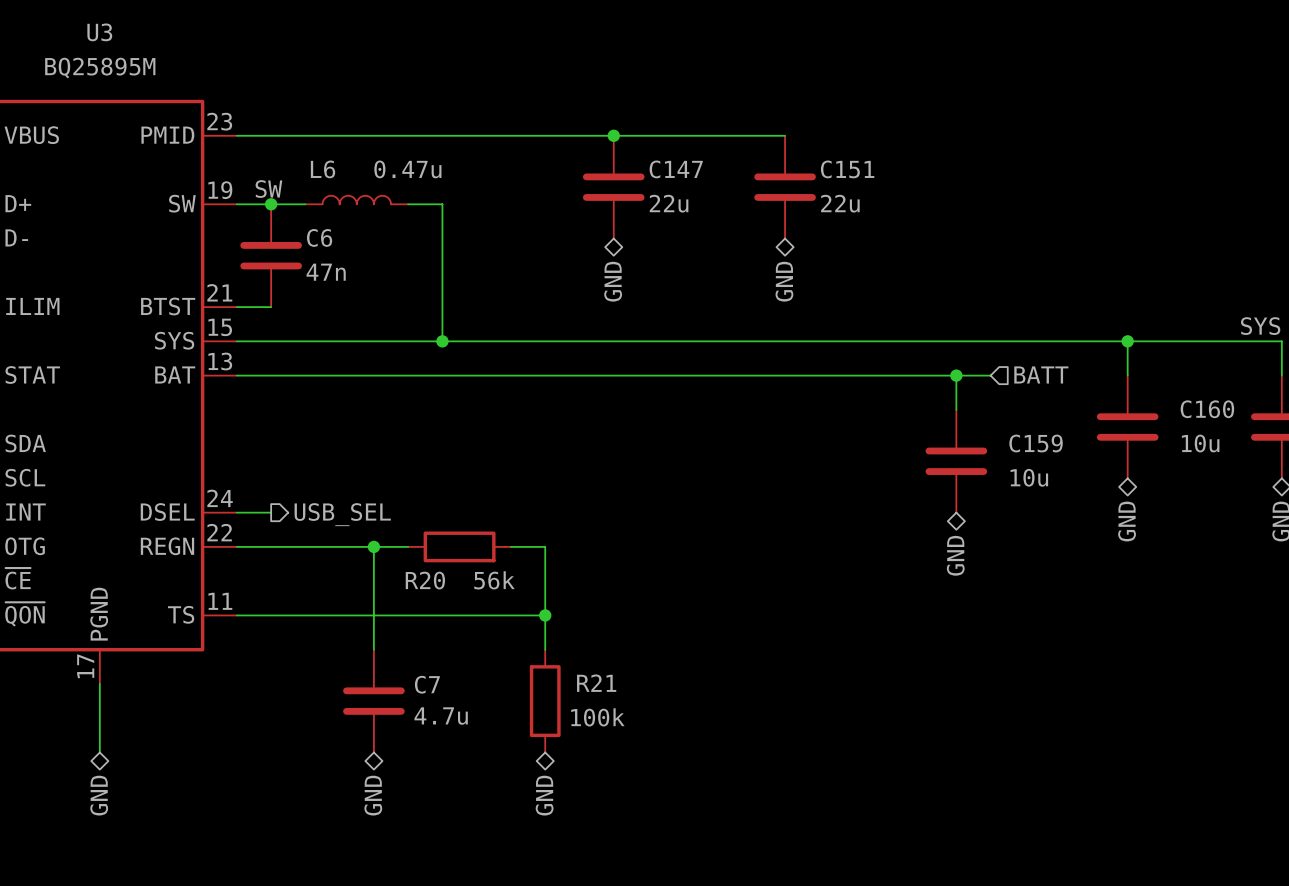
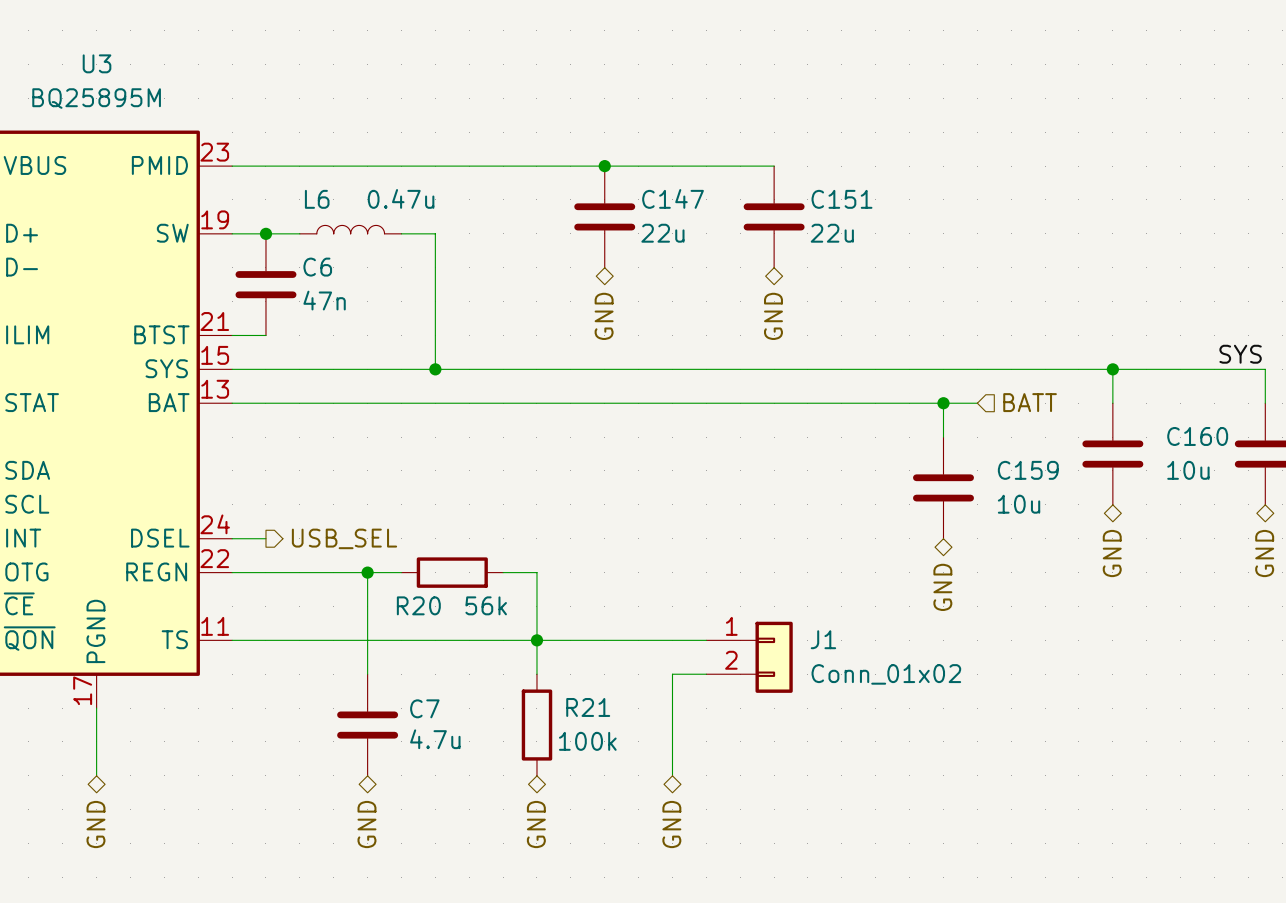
label: SW (268, 189) -> none
wire: none -> (536, 640) (706, 640)
J1: none -> Conn_01x02 (749, 657)
wire: none -> (706, 674) (672, 674) (672, 775)
hierarchical label: none -> GND (671, 824)

